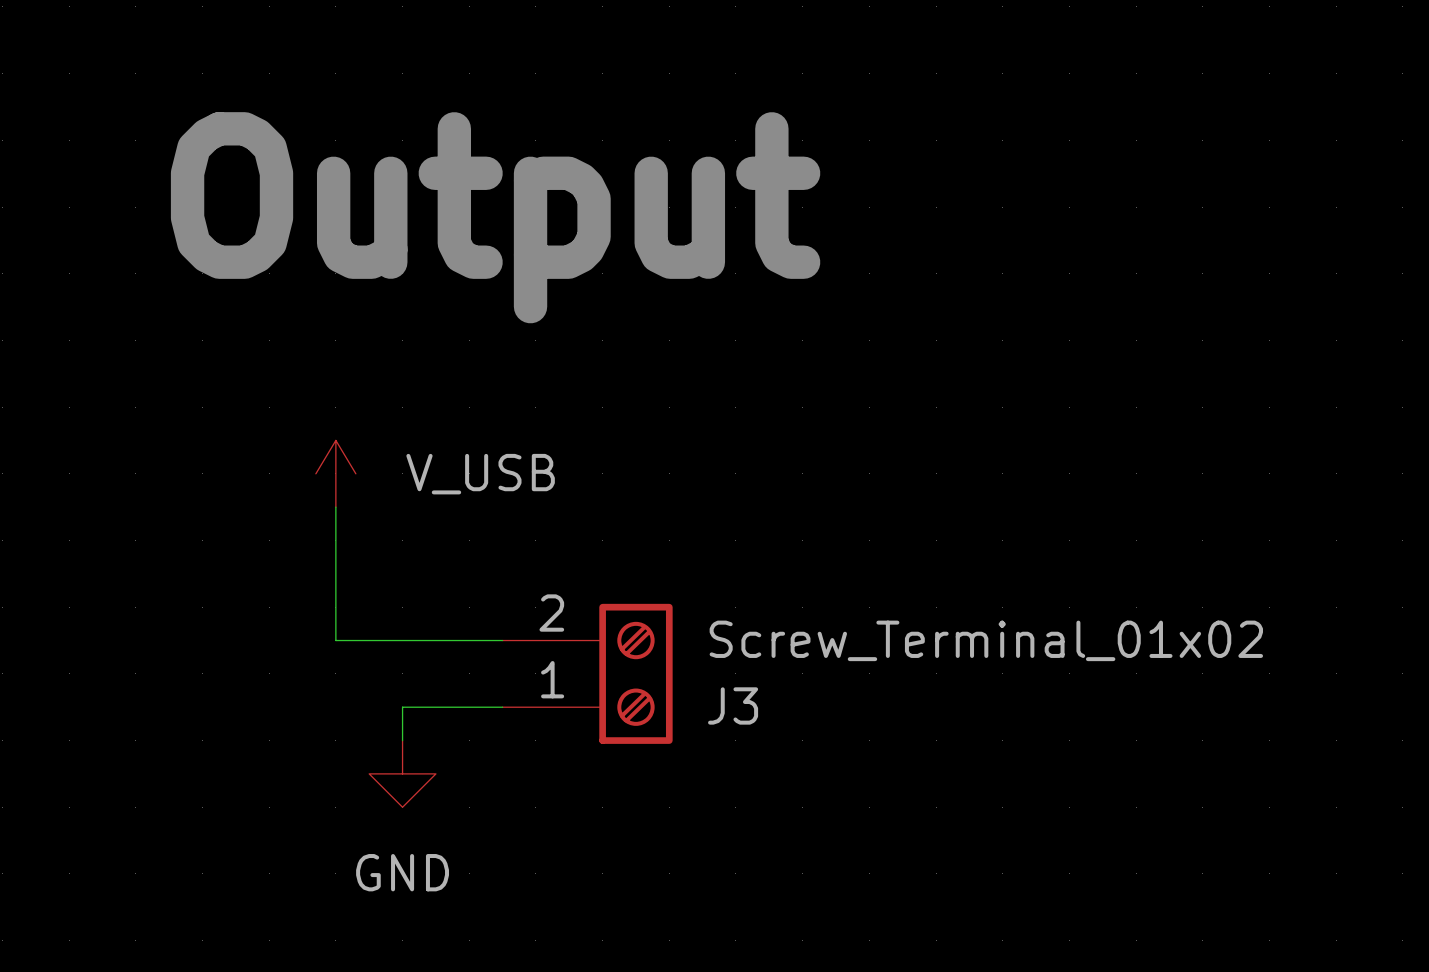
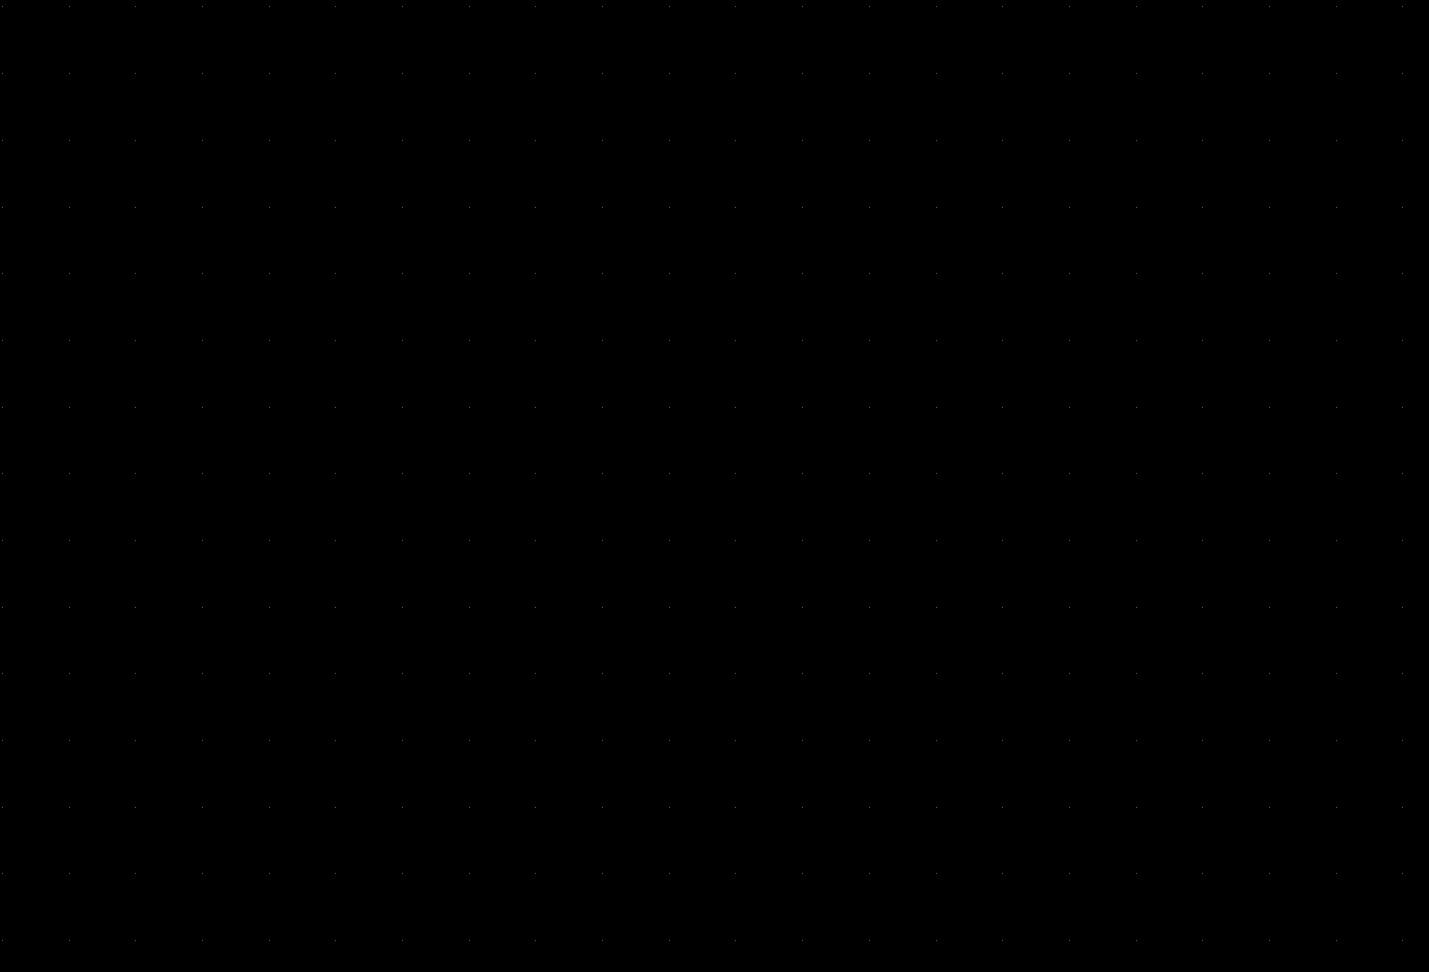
text: Output (495, 217) -> none
power symbol: V_USB (335, 473) -> none
wire: (335, 507) (335, 640) (502, 640) -> none
J3: Screw_Terminal_01x02 (587, 673) -> none
wire: (502, 707) (402, 707) (402, 740) -> none
power symbol: GND (402, 773) -> none

